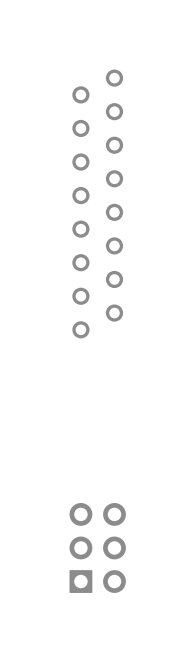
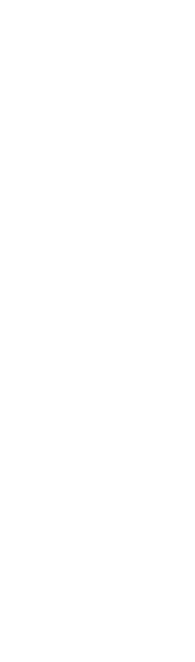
part: (97, 203) -> none
part: (97, 547) -> none

